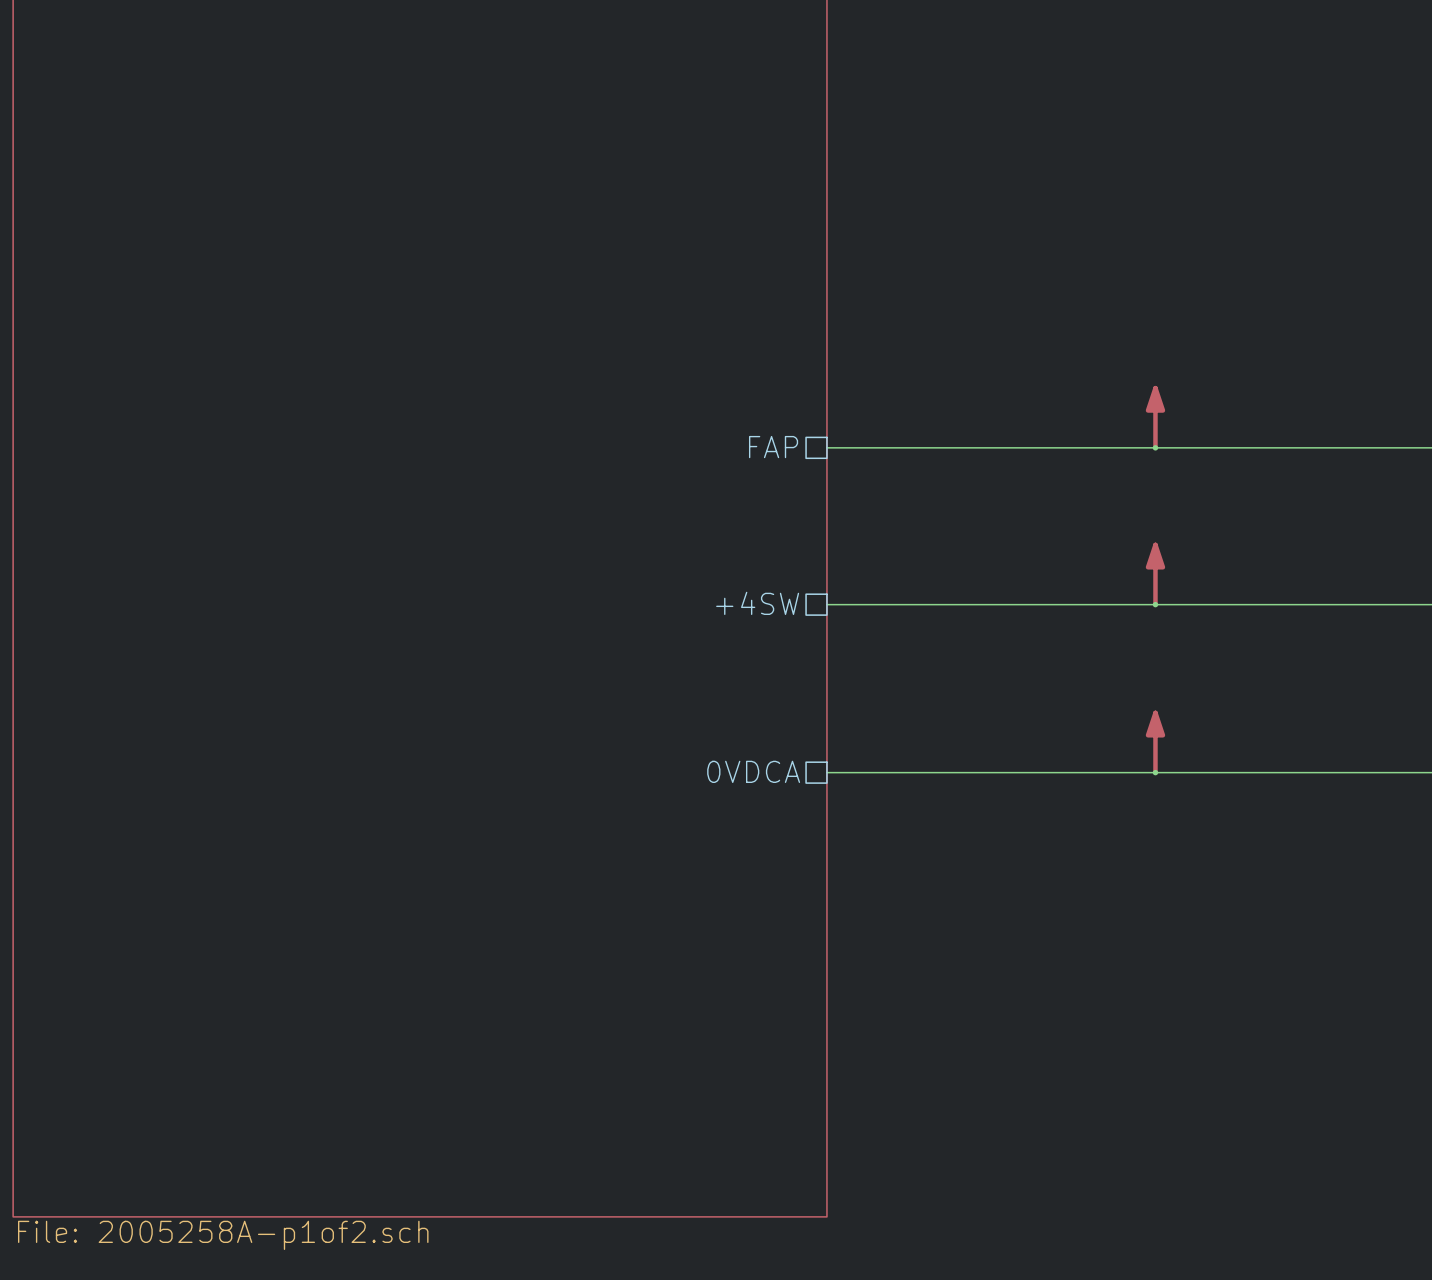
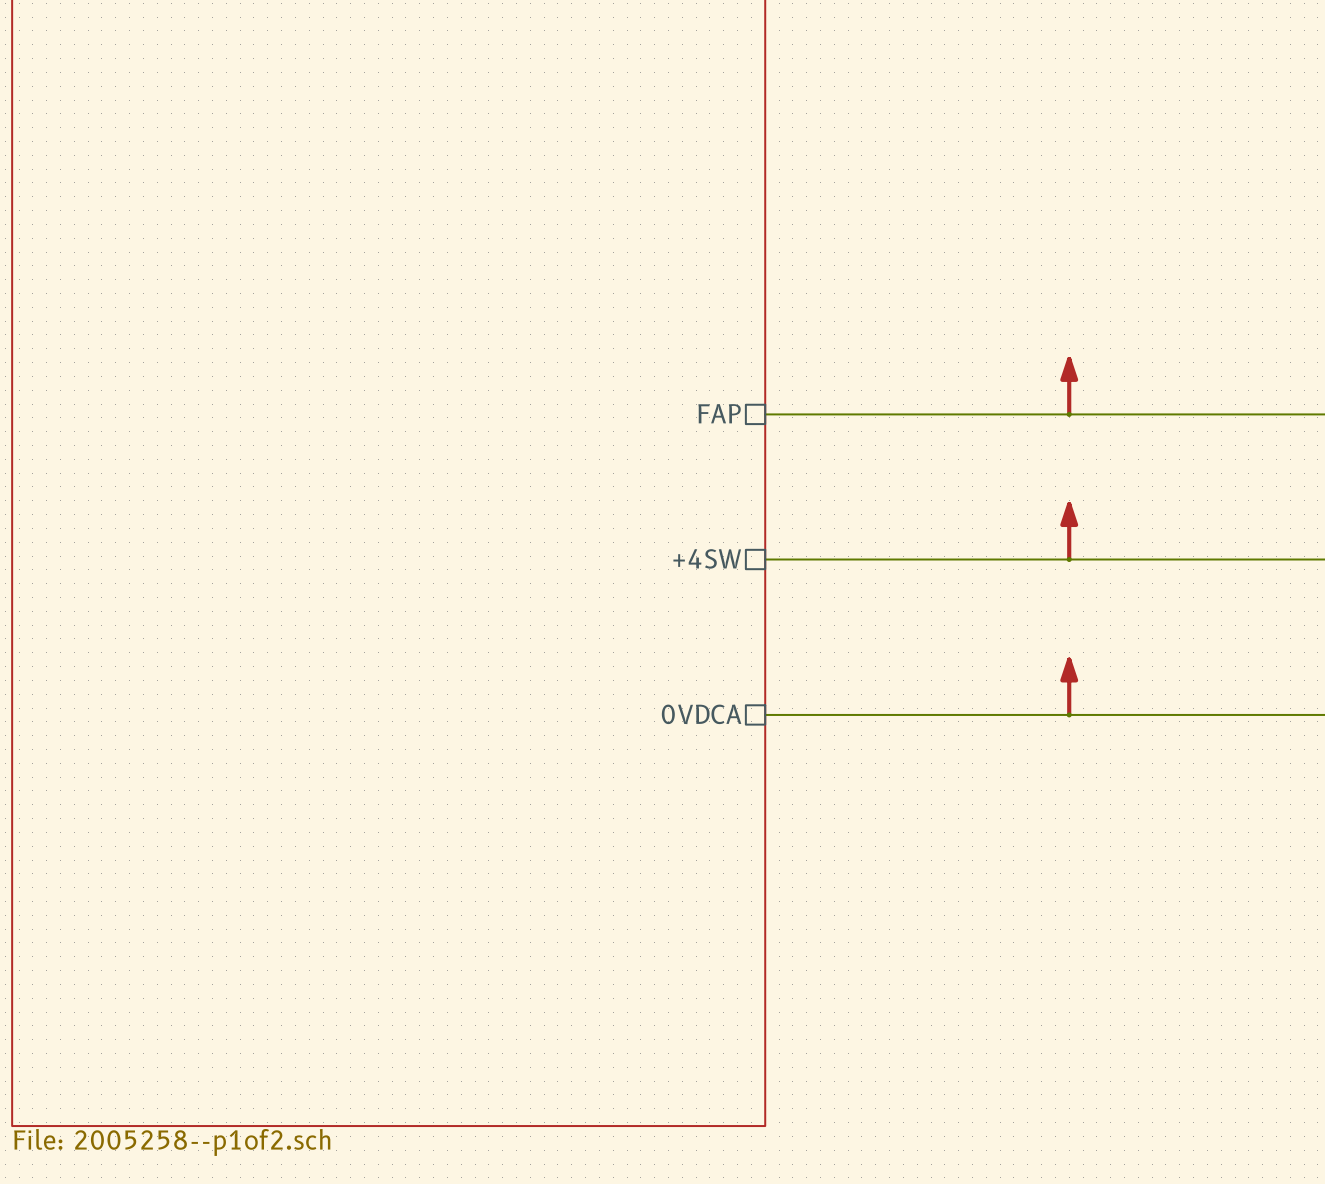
sheet value: File: 2005258A-p1of2.sch (223, 1235) -> File: 2005258--p1of2.sch (172, 1142)

